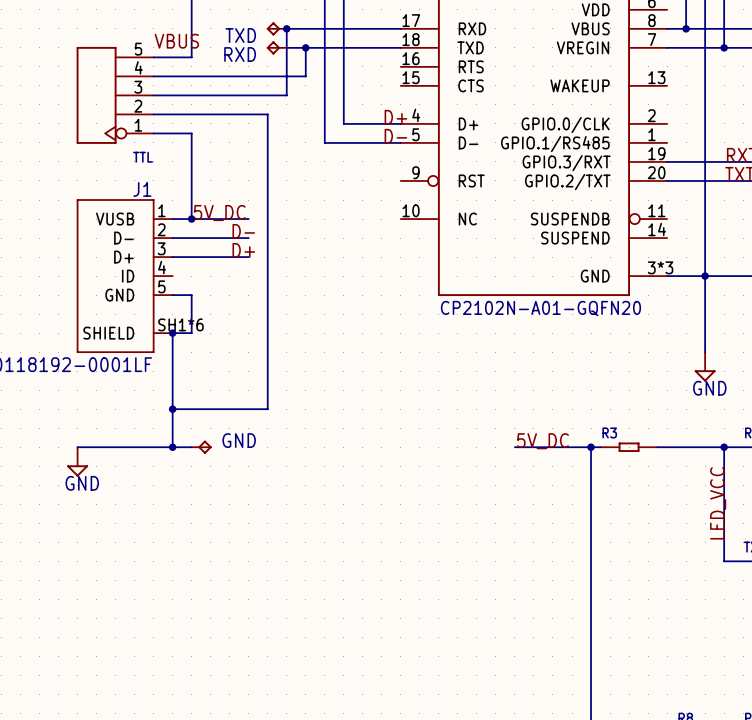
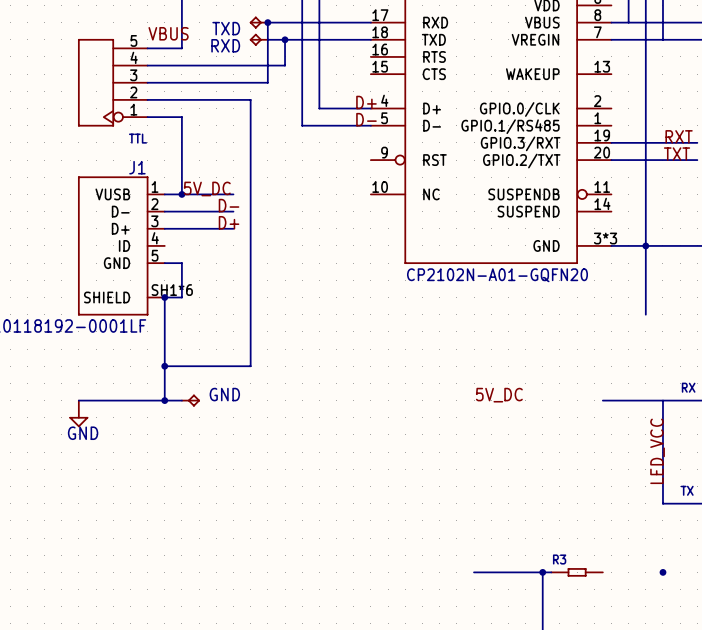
junction: (686, 28) -> none
junction: (724, 47) -> none
power symbol: GND (705, 366) -> none
wire: (514, 447) (600, 447) -> none
wire: (591, 447) (591, 637) -> none
junction: (591, 447) -> none
R3 position: (629, 447) -> (577, 572)
junction: (724, 447) -> none
wire: none -> (474, 572) (551, 572)
junction: none -> (542, 572)
junction: none -> (662, 572)

